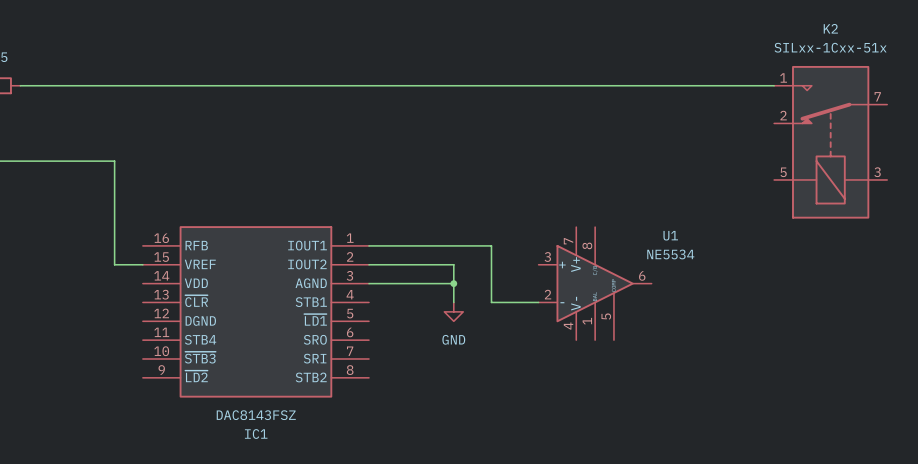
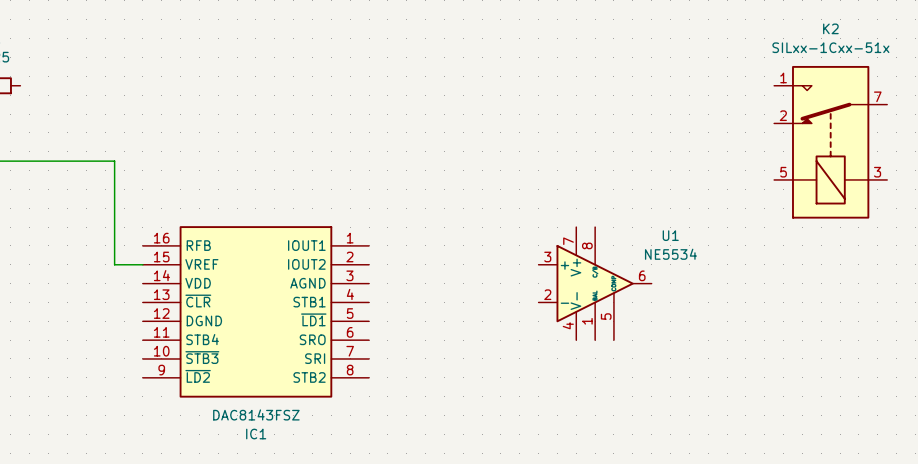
wire: (20, 85) (774, 85) -> none
wire: (369, 245) (491, 245) (491, 302) (538, 302) -> none
wire: (369, 264) (453, 264) (453, 302) -> none
wire: (369, 283) (453, 283) -> none
junction: (453, 283) -> none
power symbol: GND (453, 311) -> none

